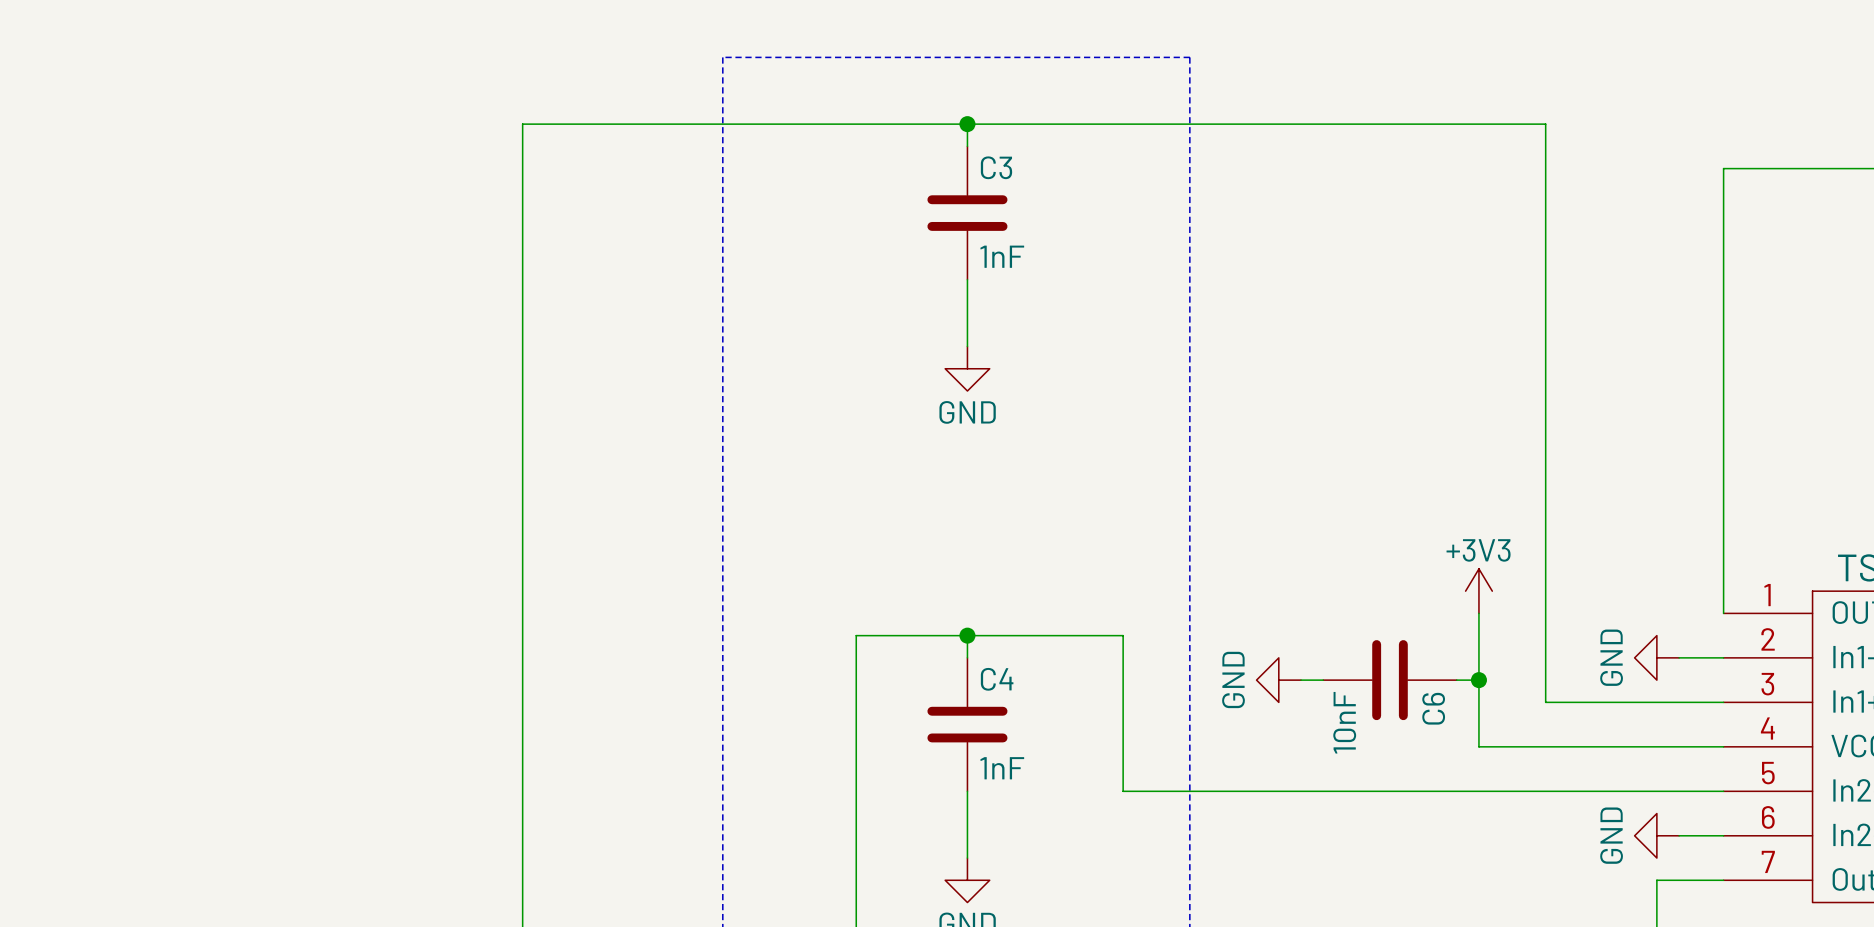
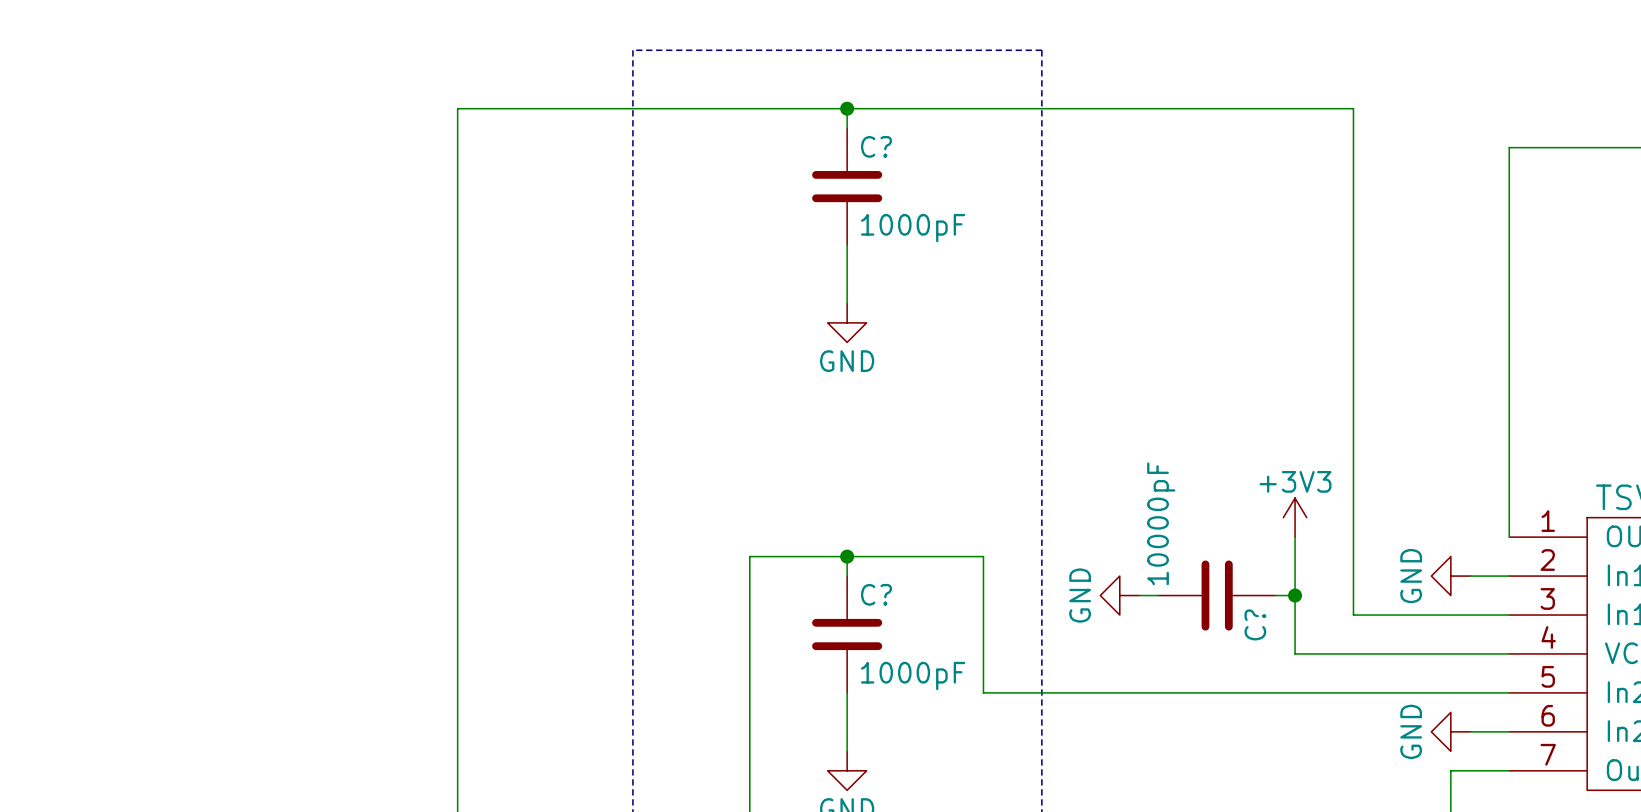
C3 name: C3 (996, 167) -> C? (876, 146)
C3 value: 1nF (1002, 256) -> 1000pF (913, 228)
C4 name: C4 (997, 679) -> C? (876, 594)
C6 name: C6 (1433, 708) -> C? (1255, 624)
C6 value: 10nF (1344, 722) -> 10000pF (1161, 523)
C4 value: 1nF (1002, 768) -> 1000pF (913, 675)

